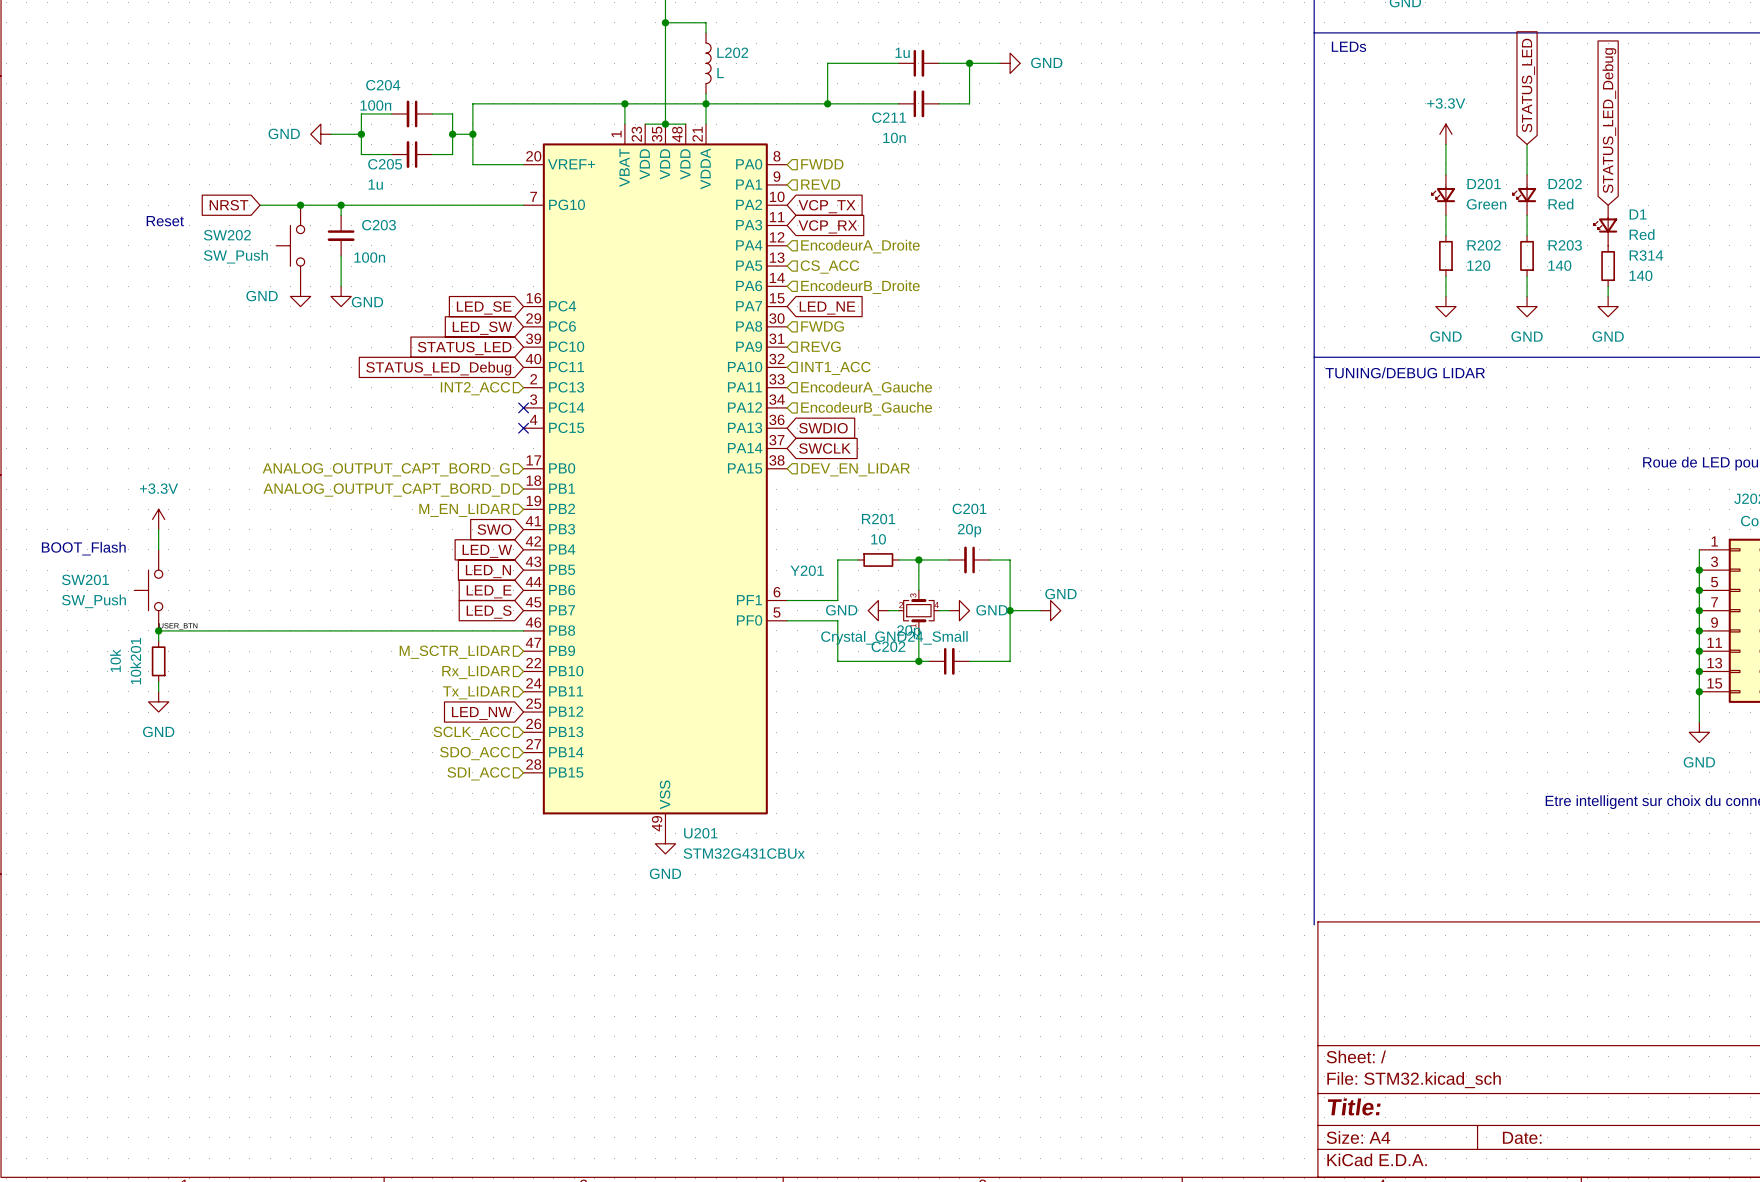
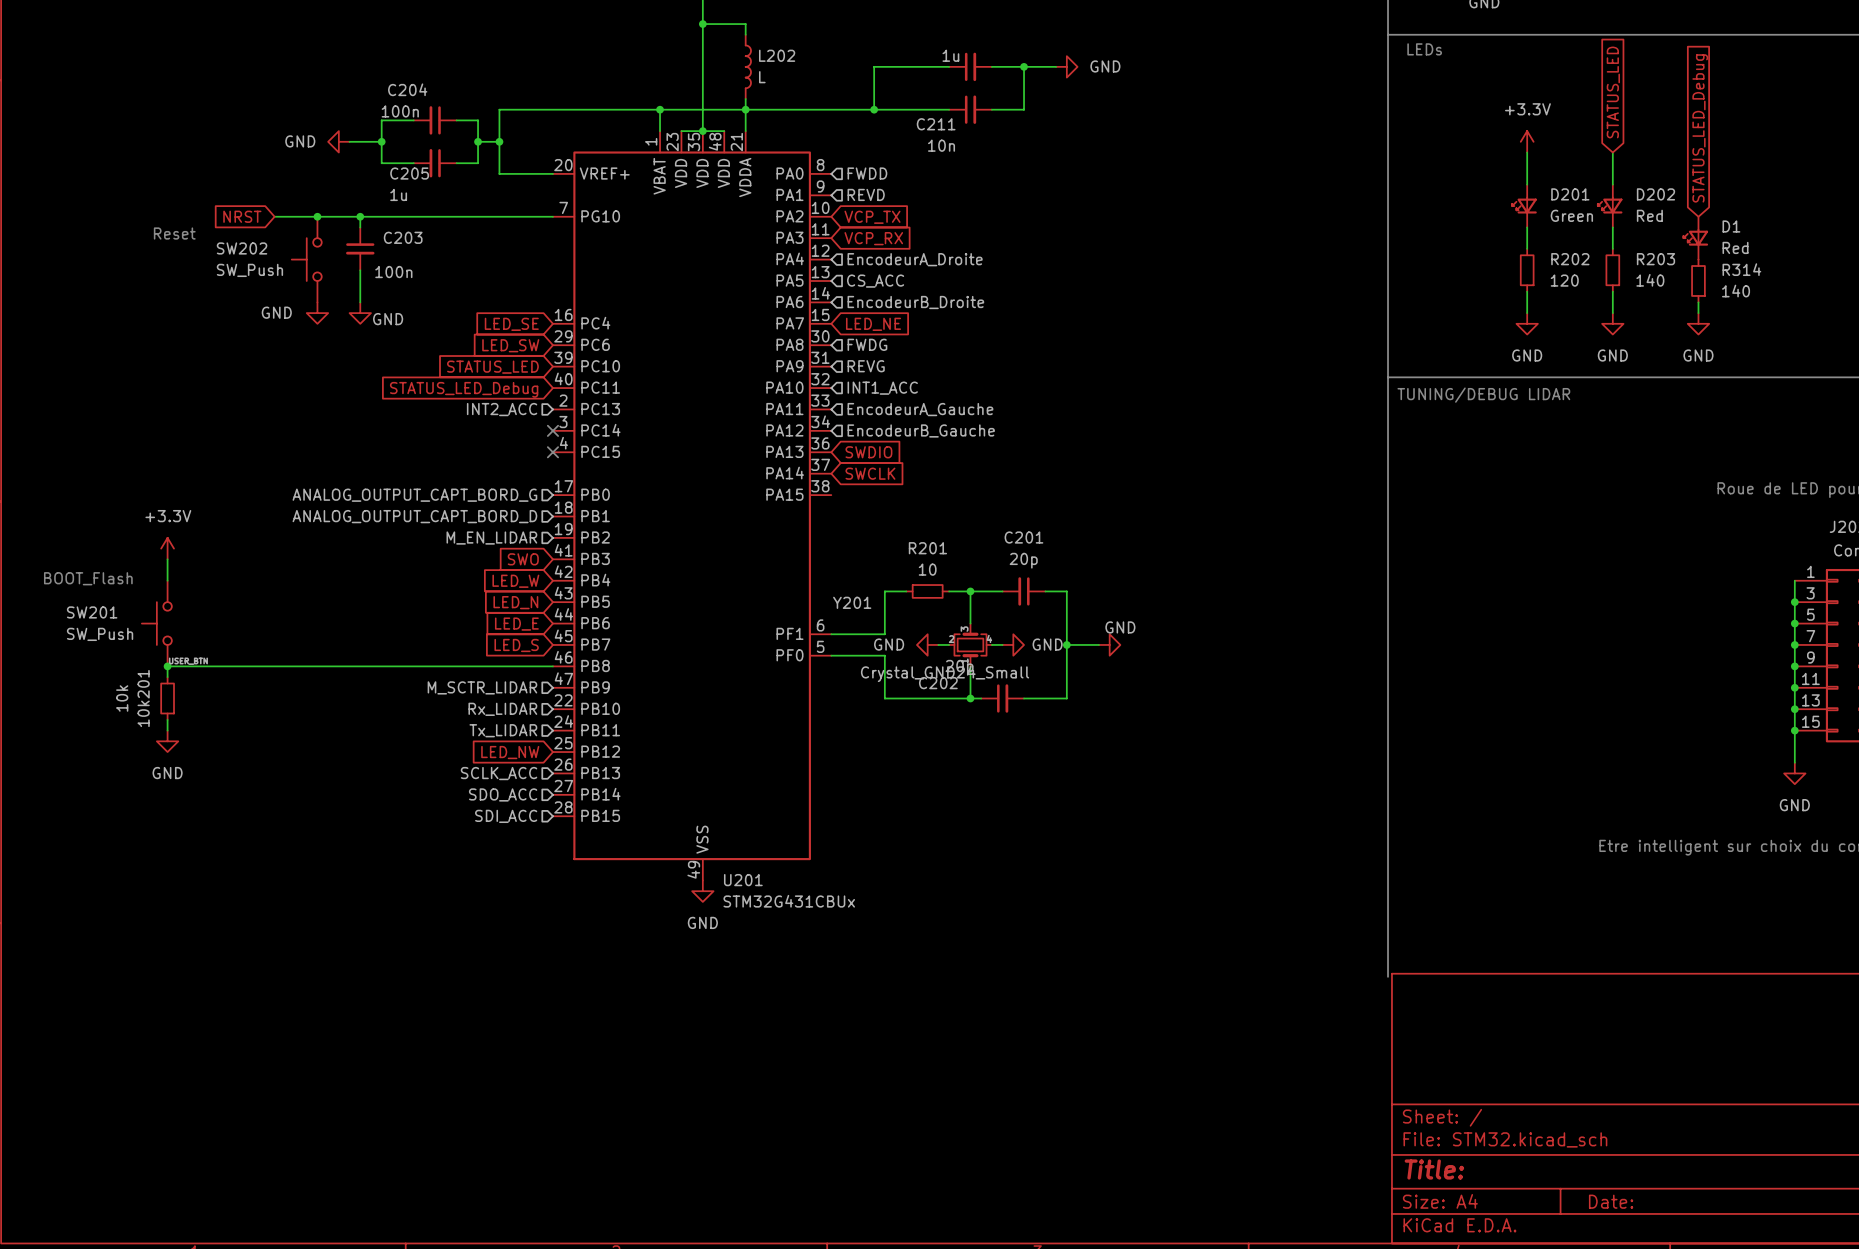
hierarchical label: DEV_EN_LIDAR (855, 469) -> none

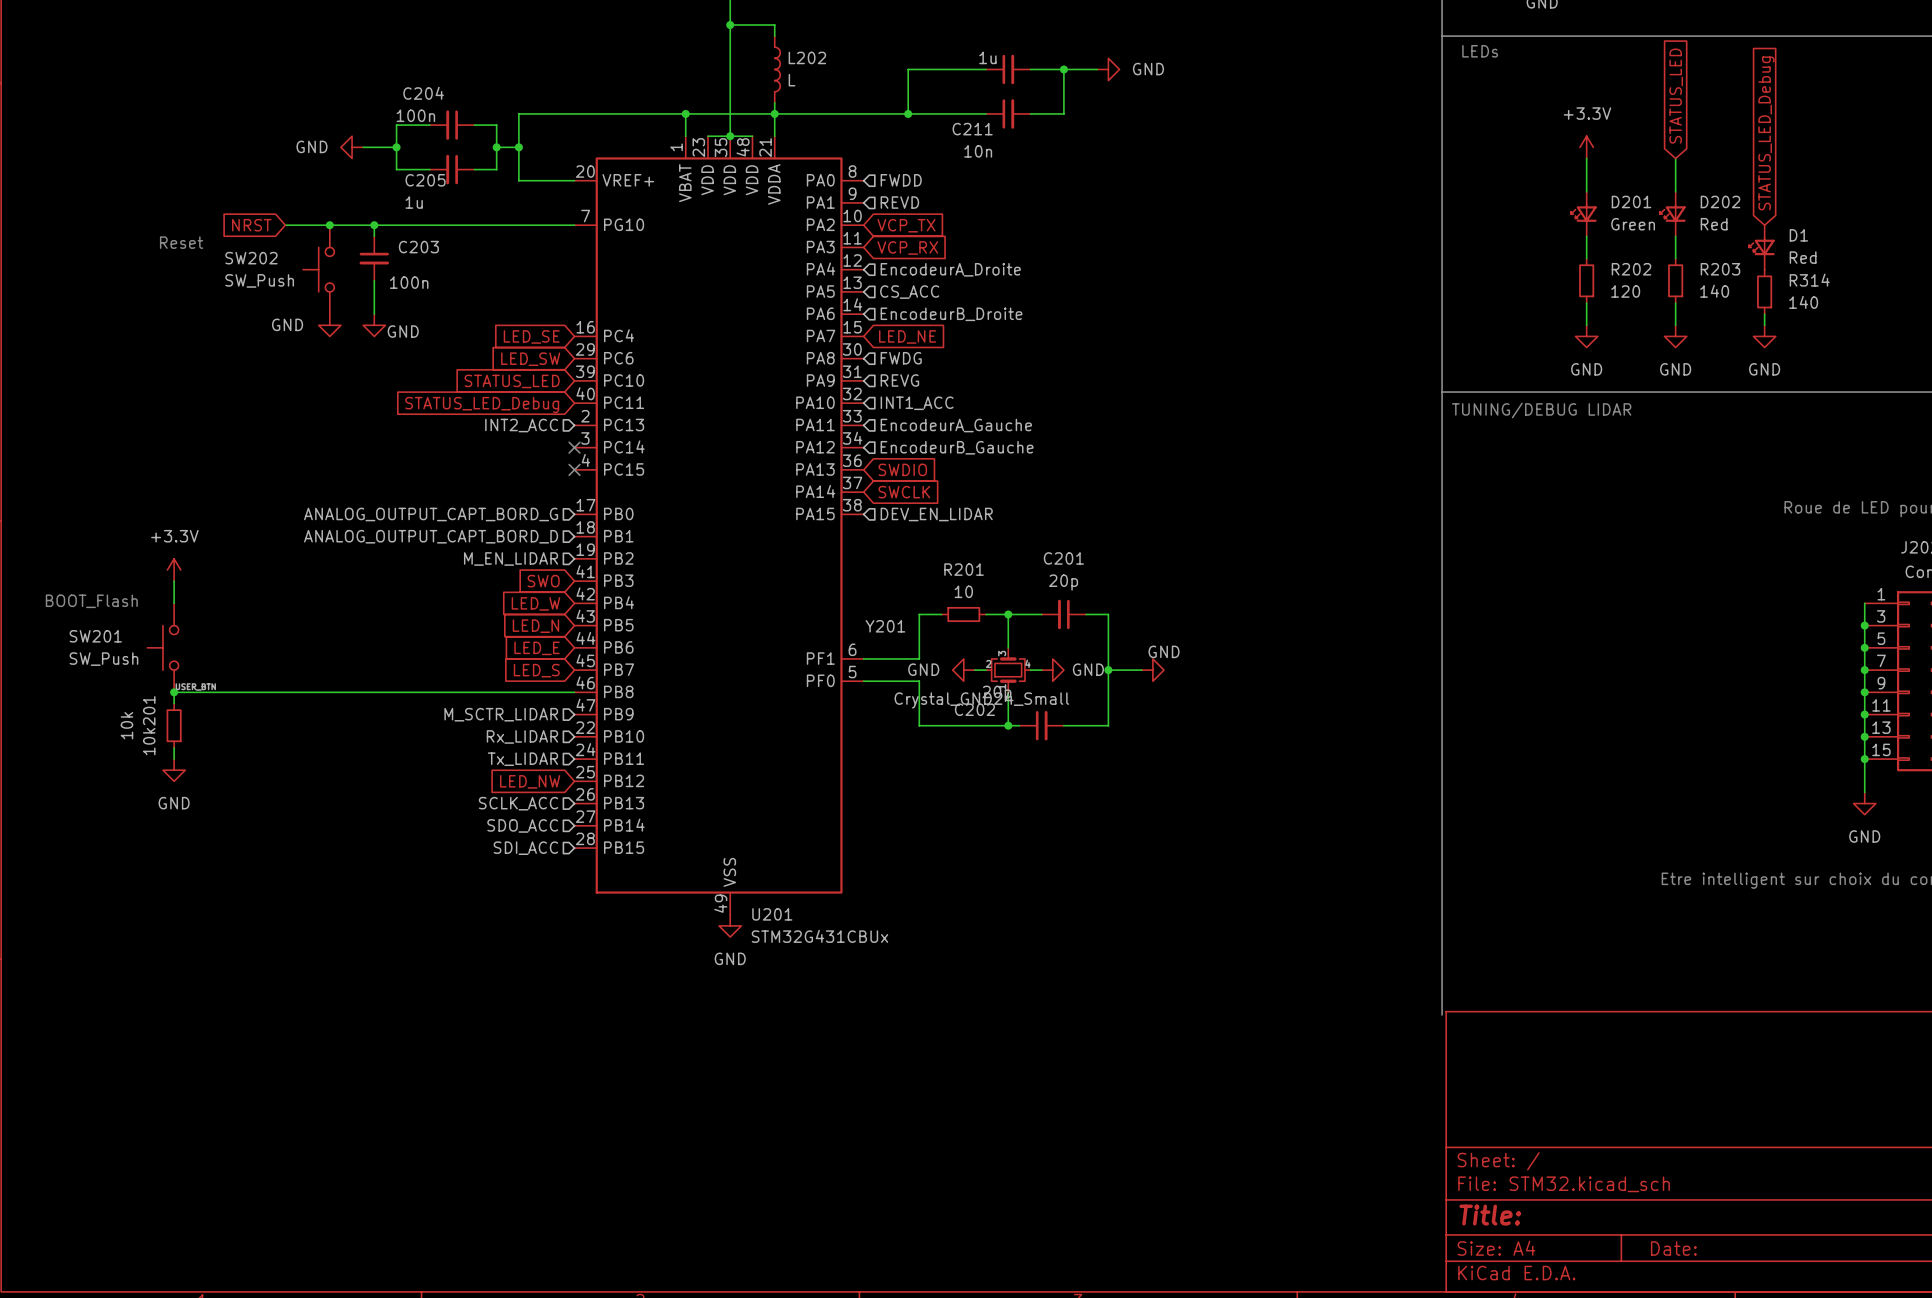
hierarchical label: none -> DEV_EN_LIDAR (936, 514)

